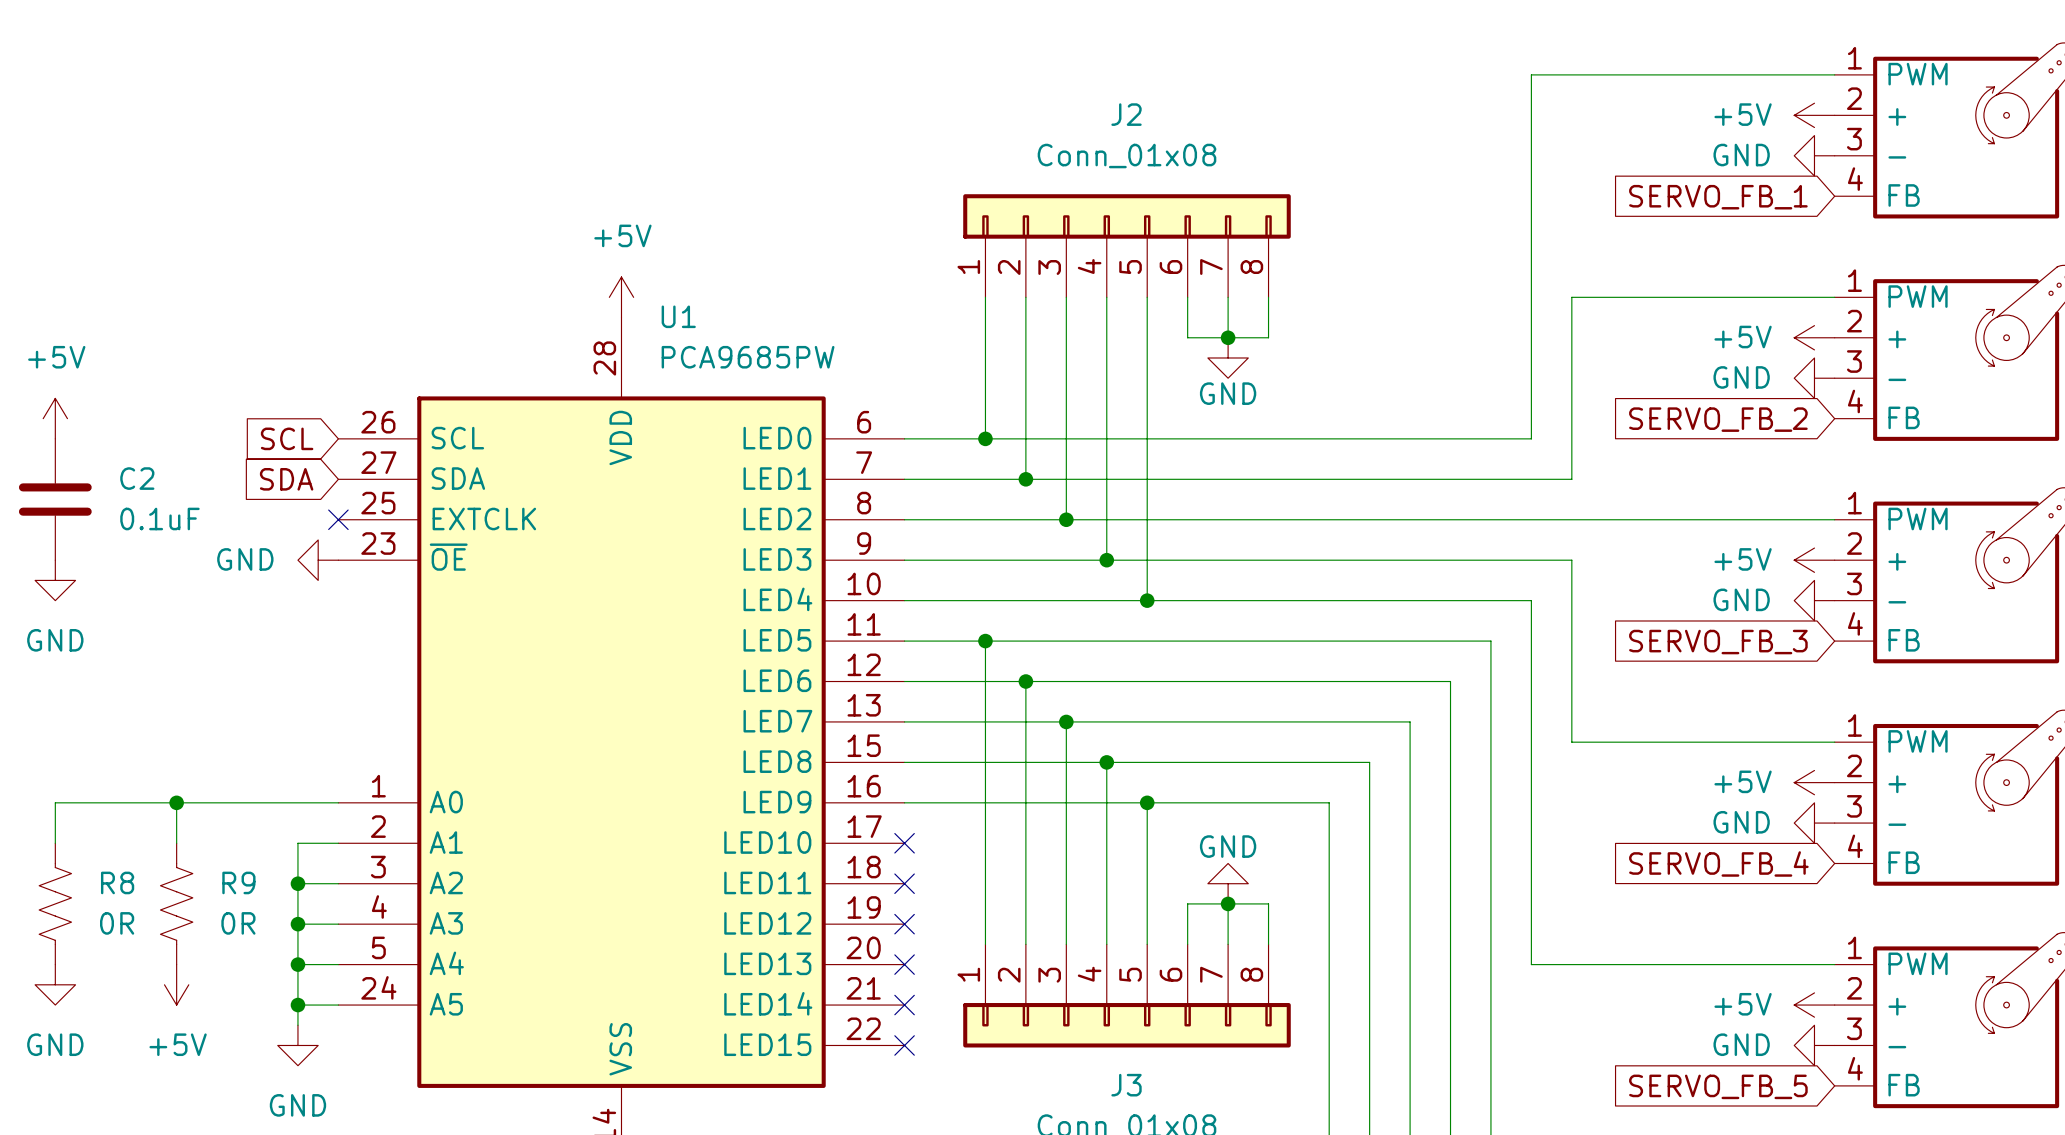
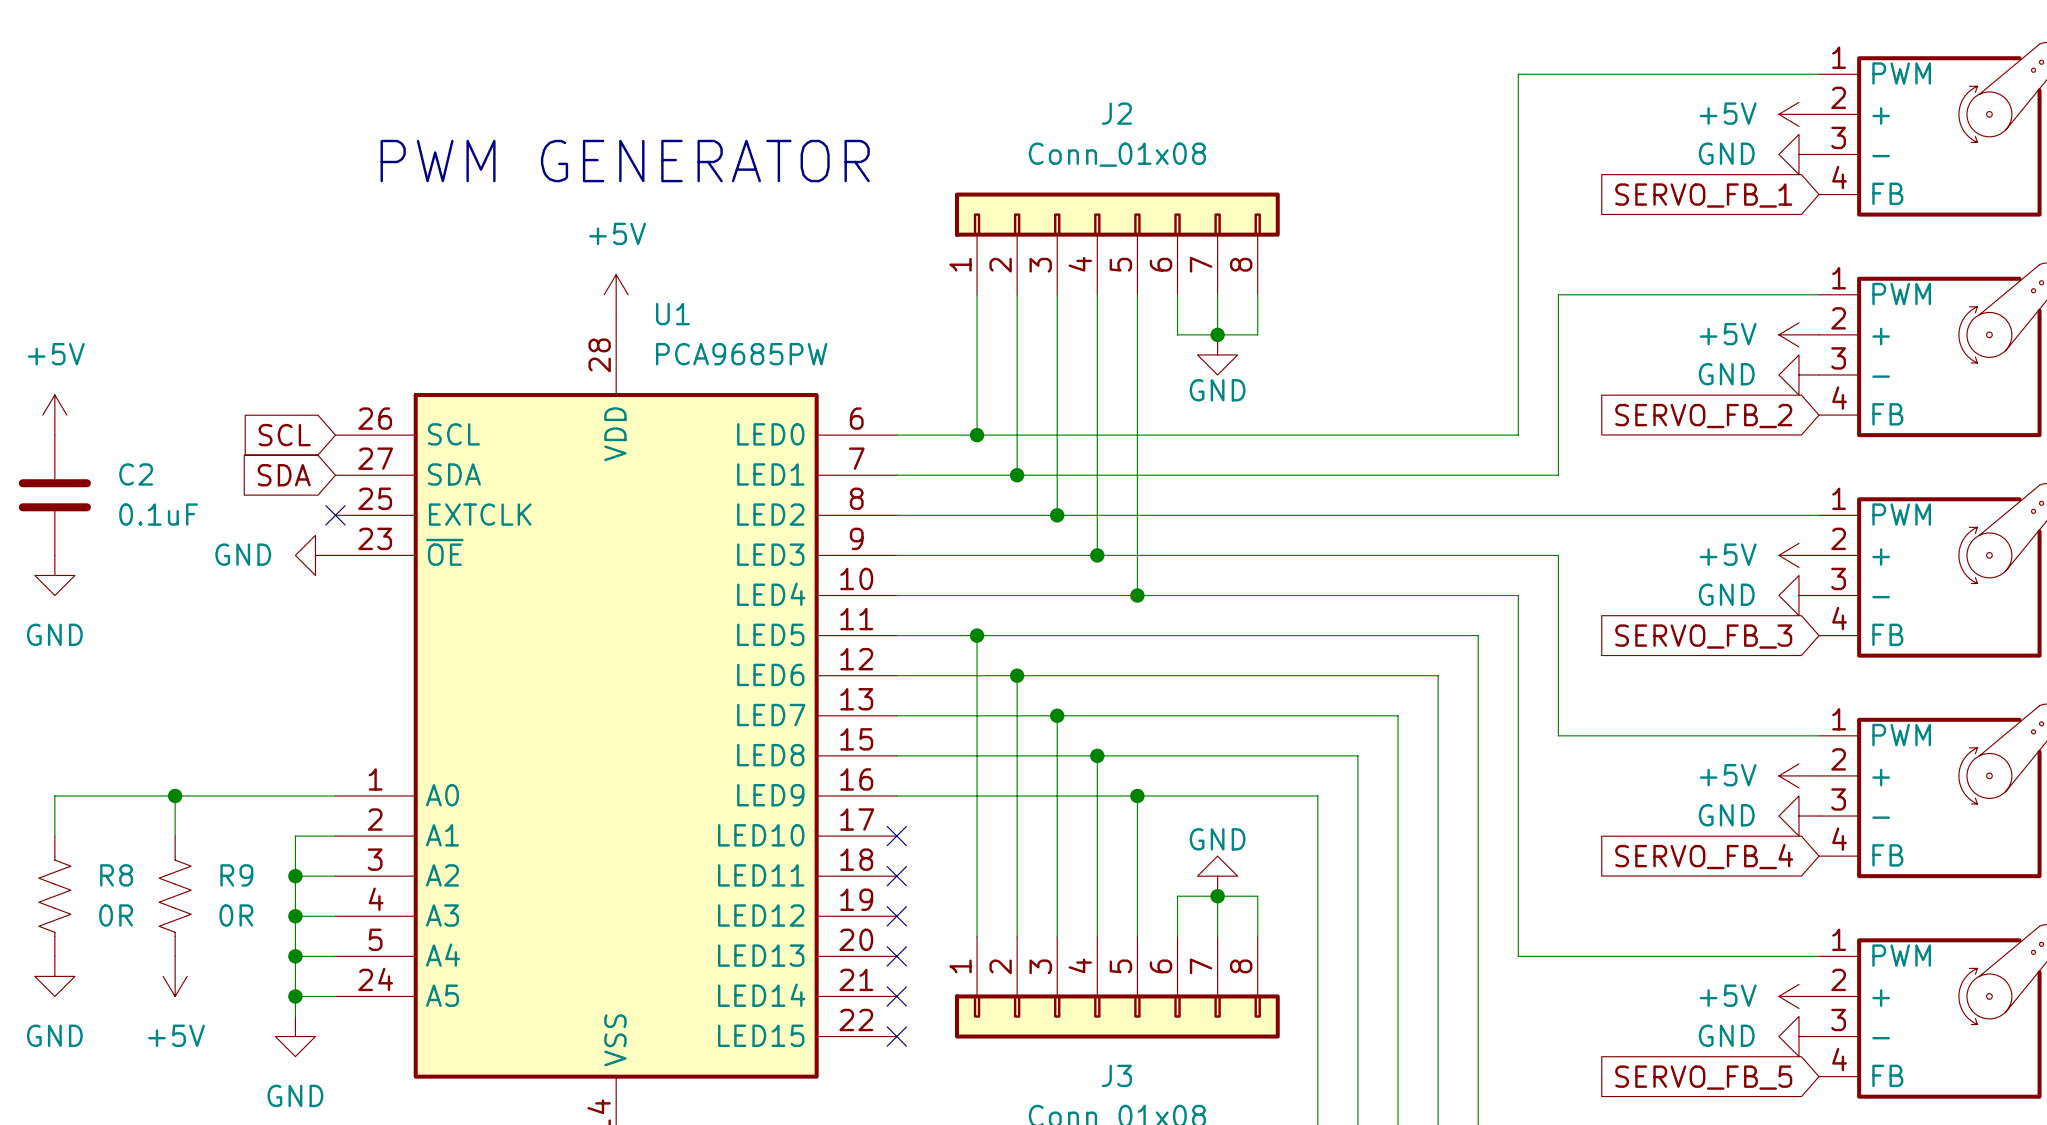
text: none -> PWM GENERATOR (625, 161)

